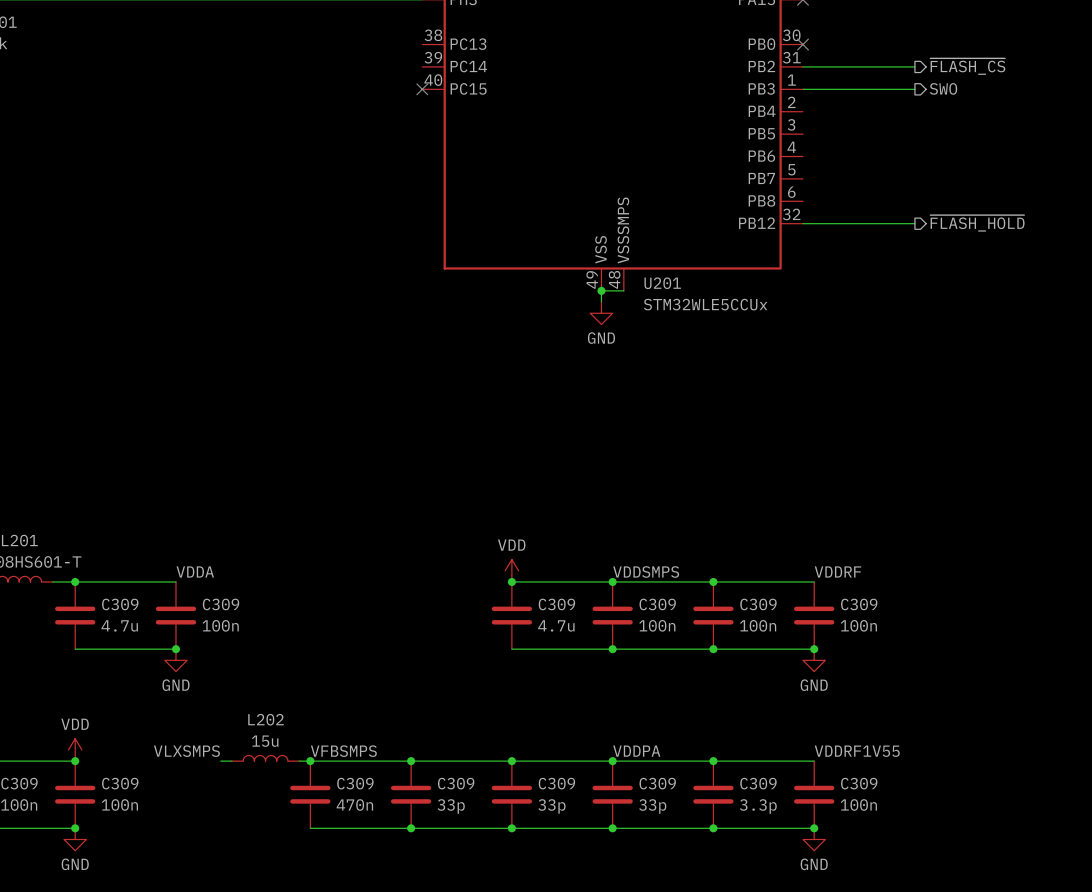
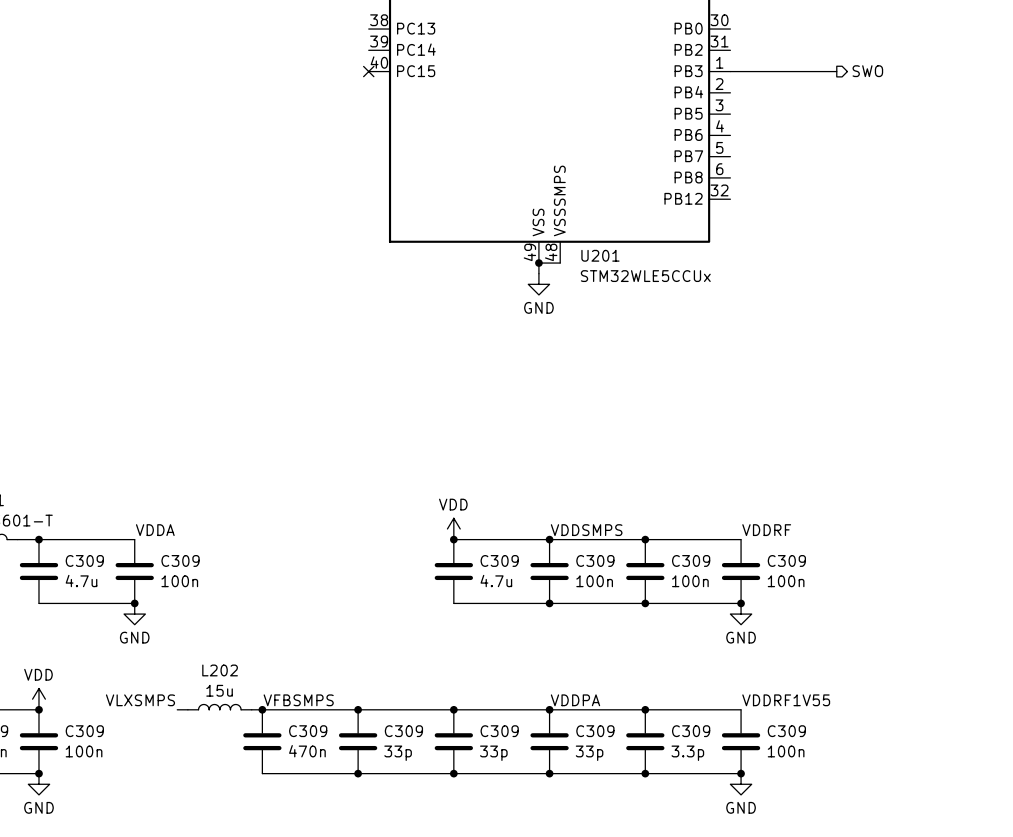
no-connect mark: (802, 44) -> none
wire: (802, 66) (914, 66) -> none
hierarchical label: ~{FLASH_CS} (967, 66) -> none
wire: (802, 223) (914, 223) -> none
hierarchical label: ~{FLASH_HOLD} (977, 223) -> none

